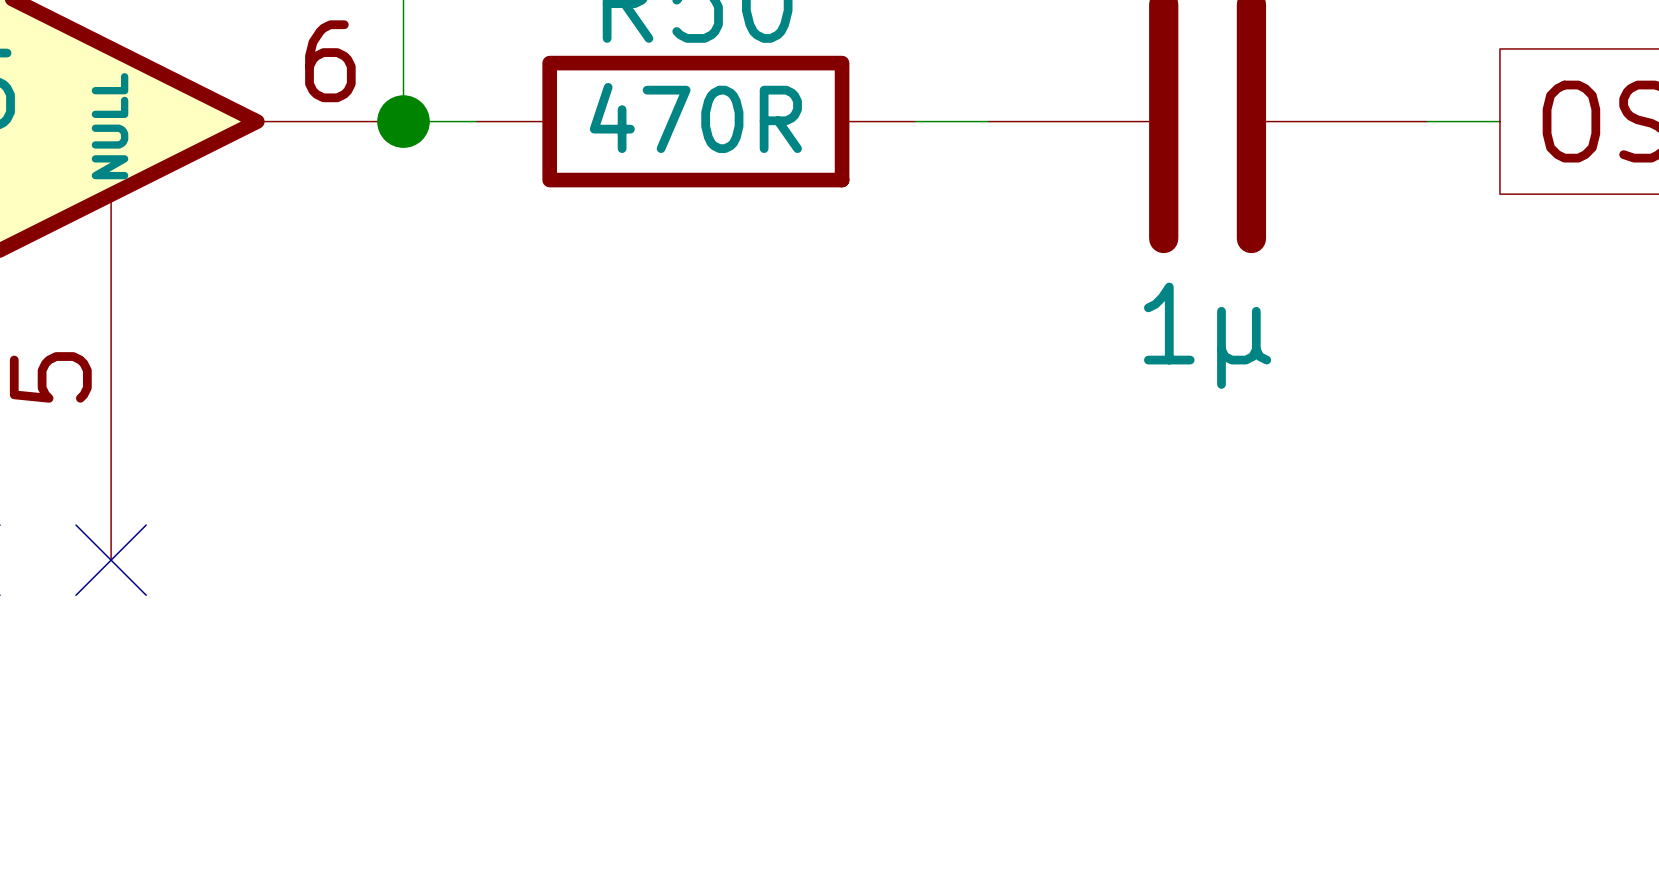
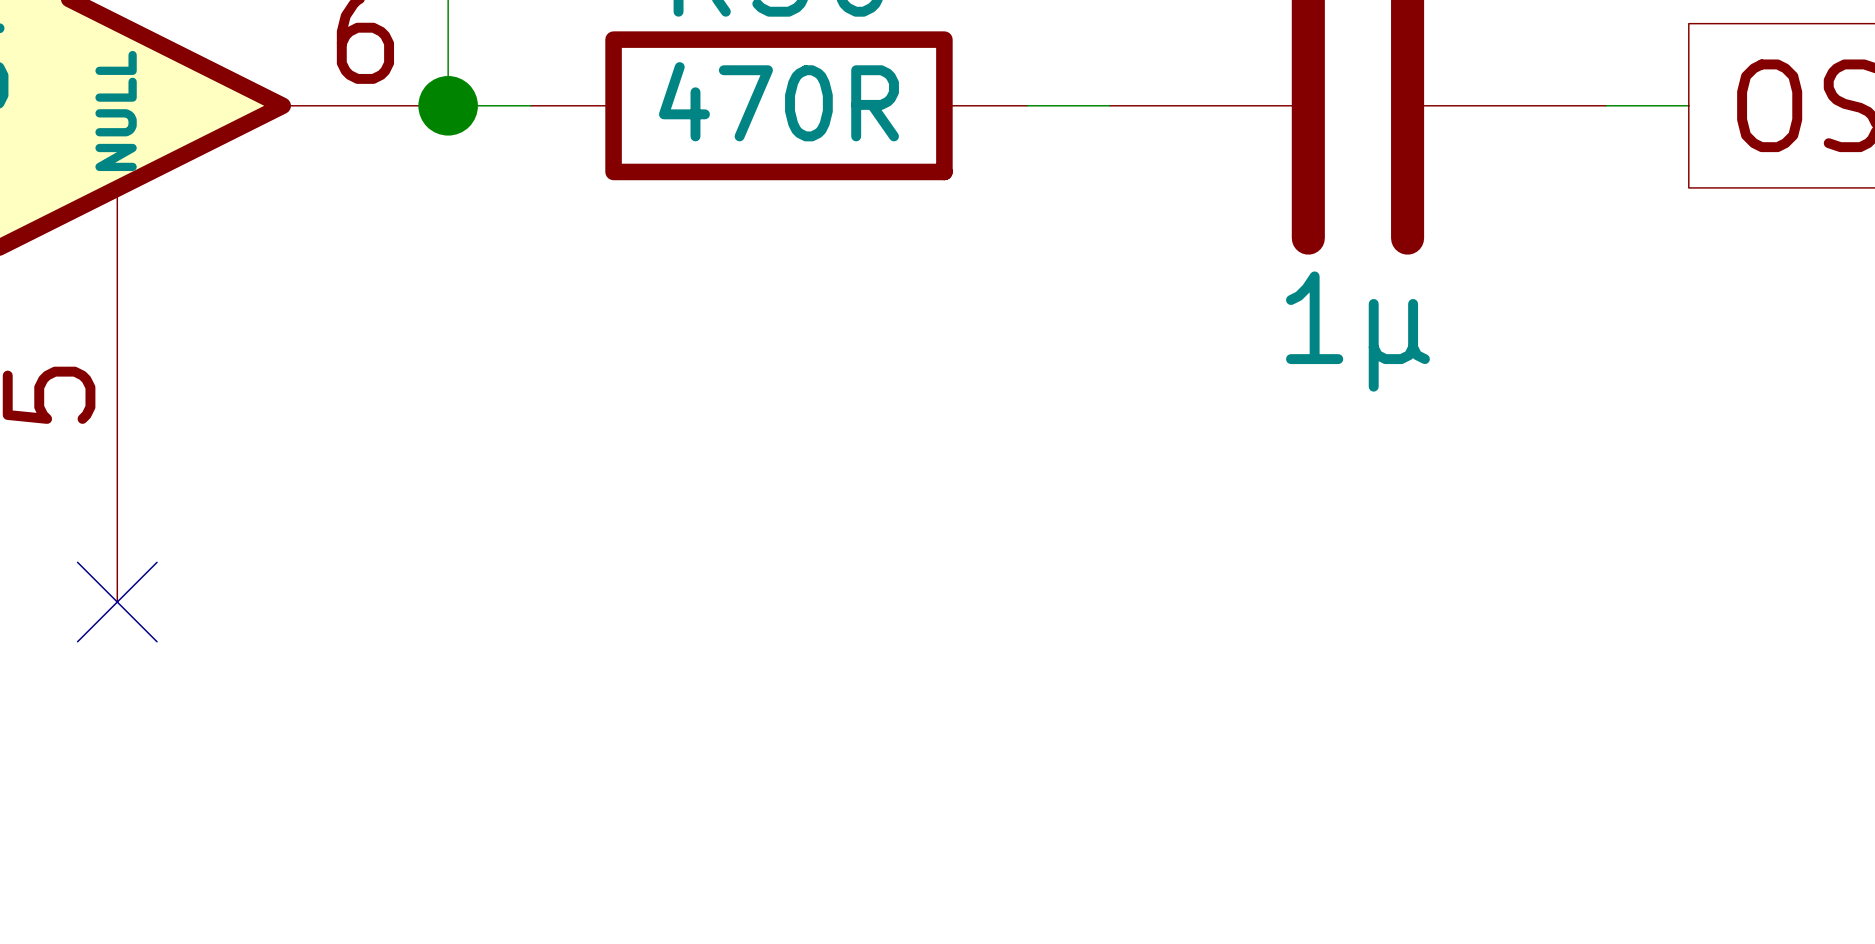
part value position: 1µ (1207, 335) -> 1µ (1357, 331)

